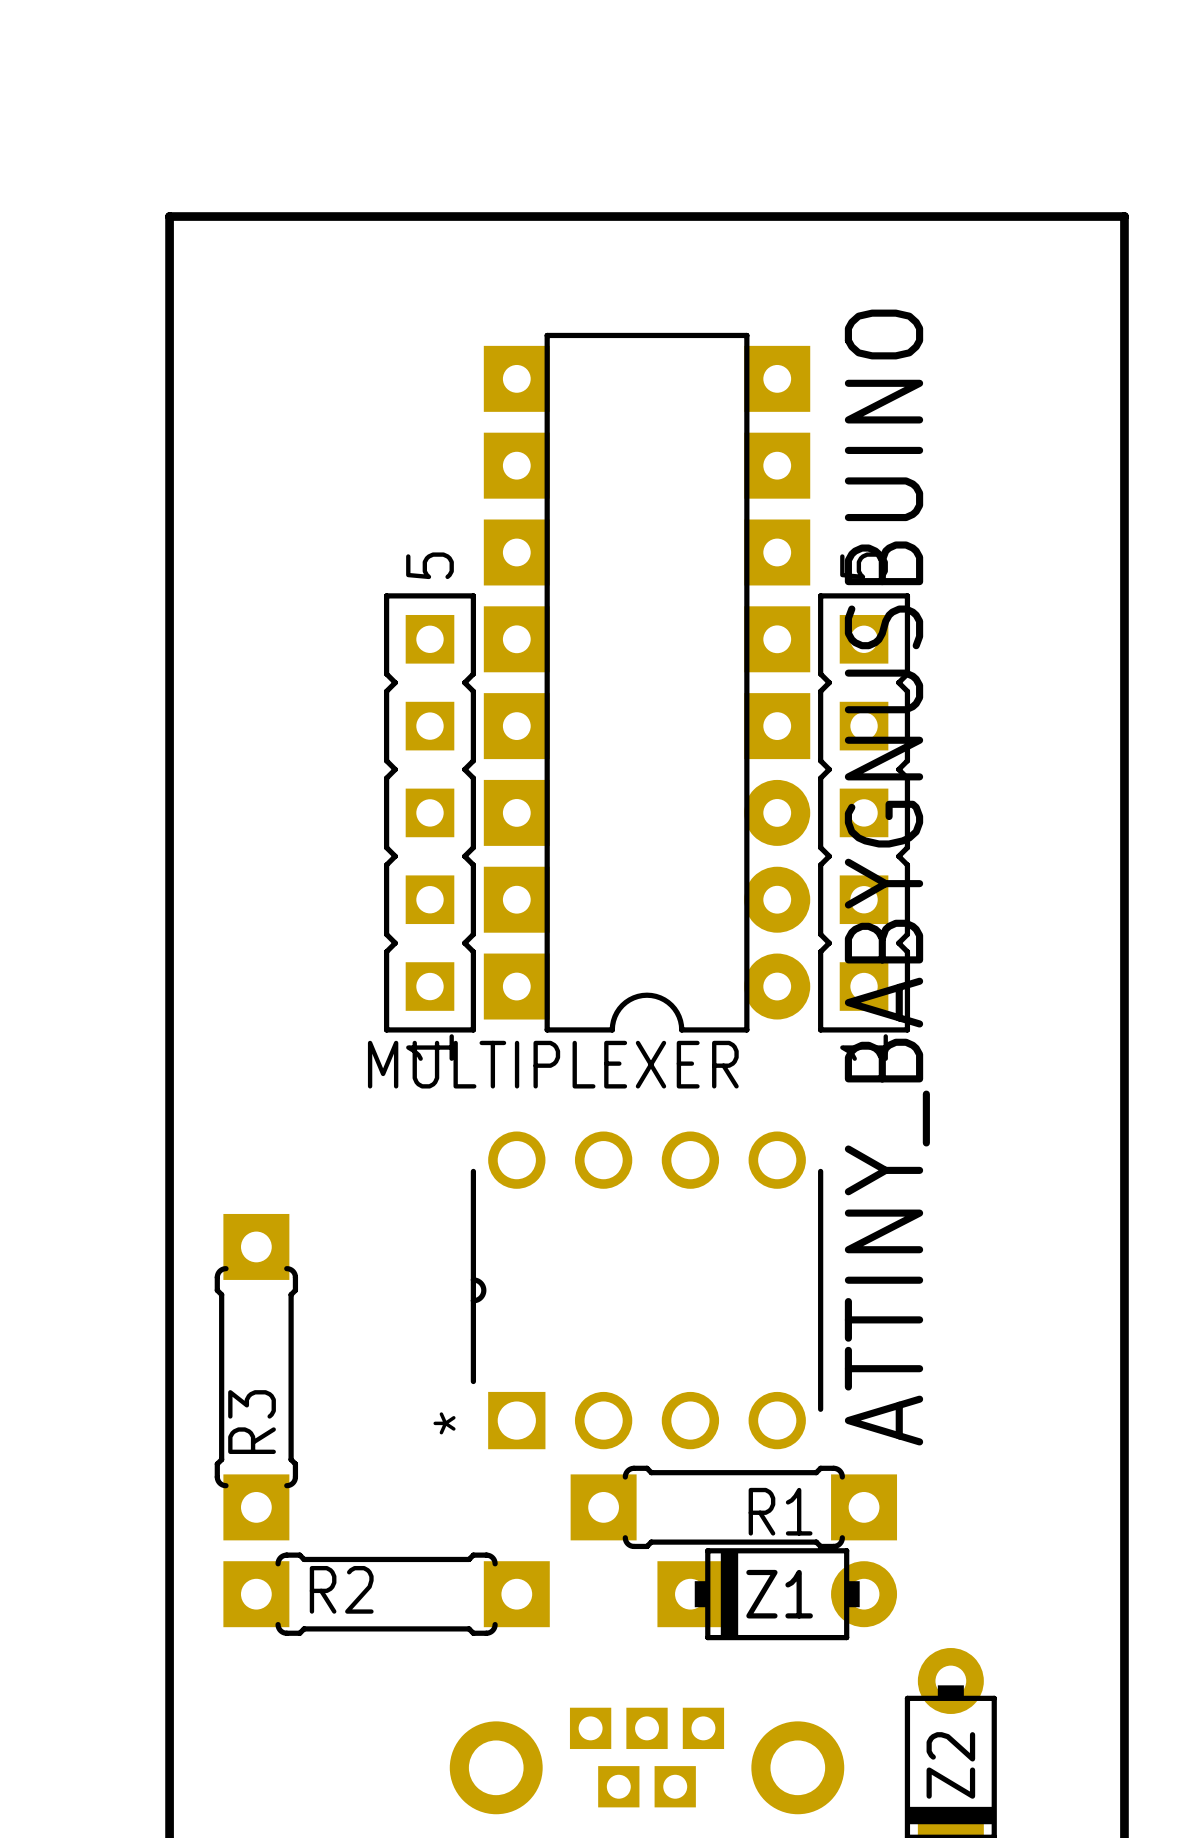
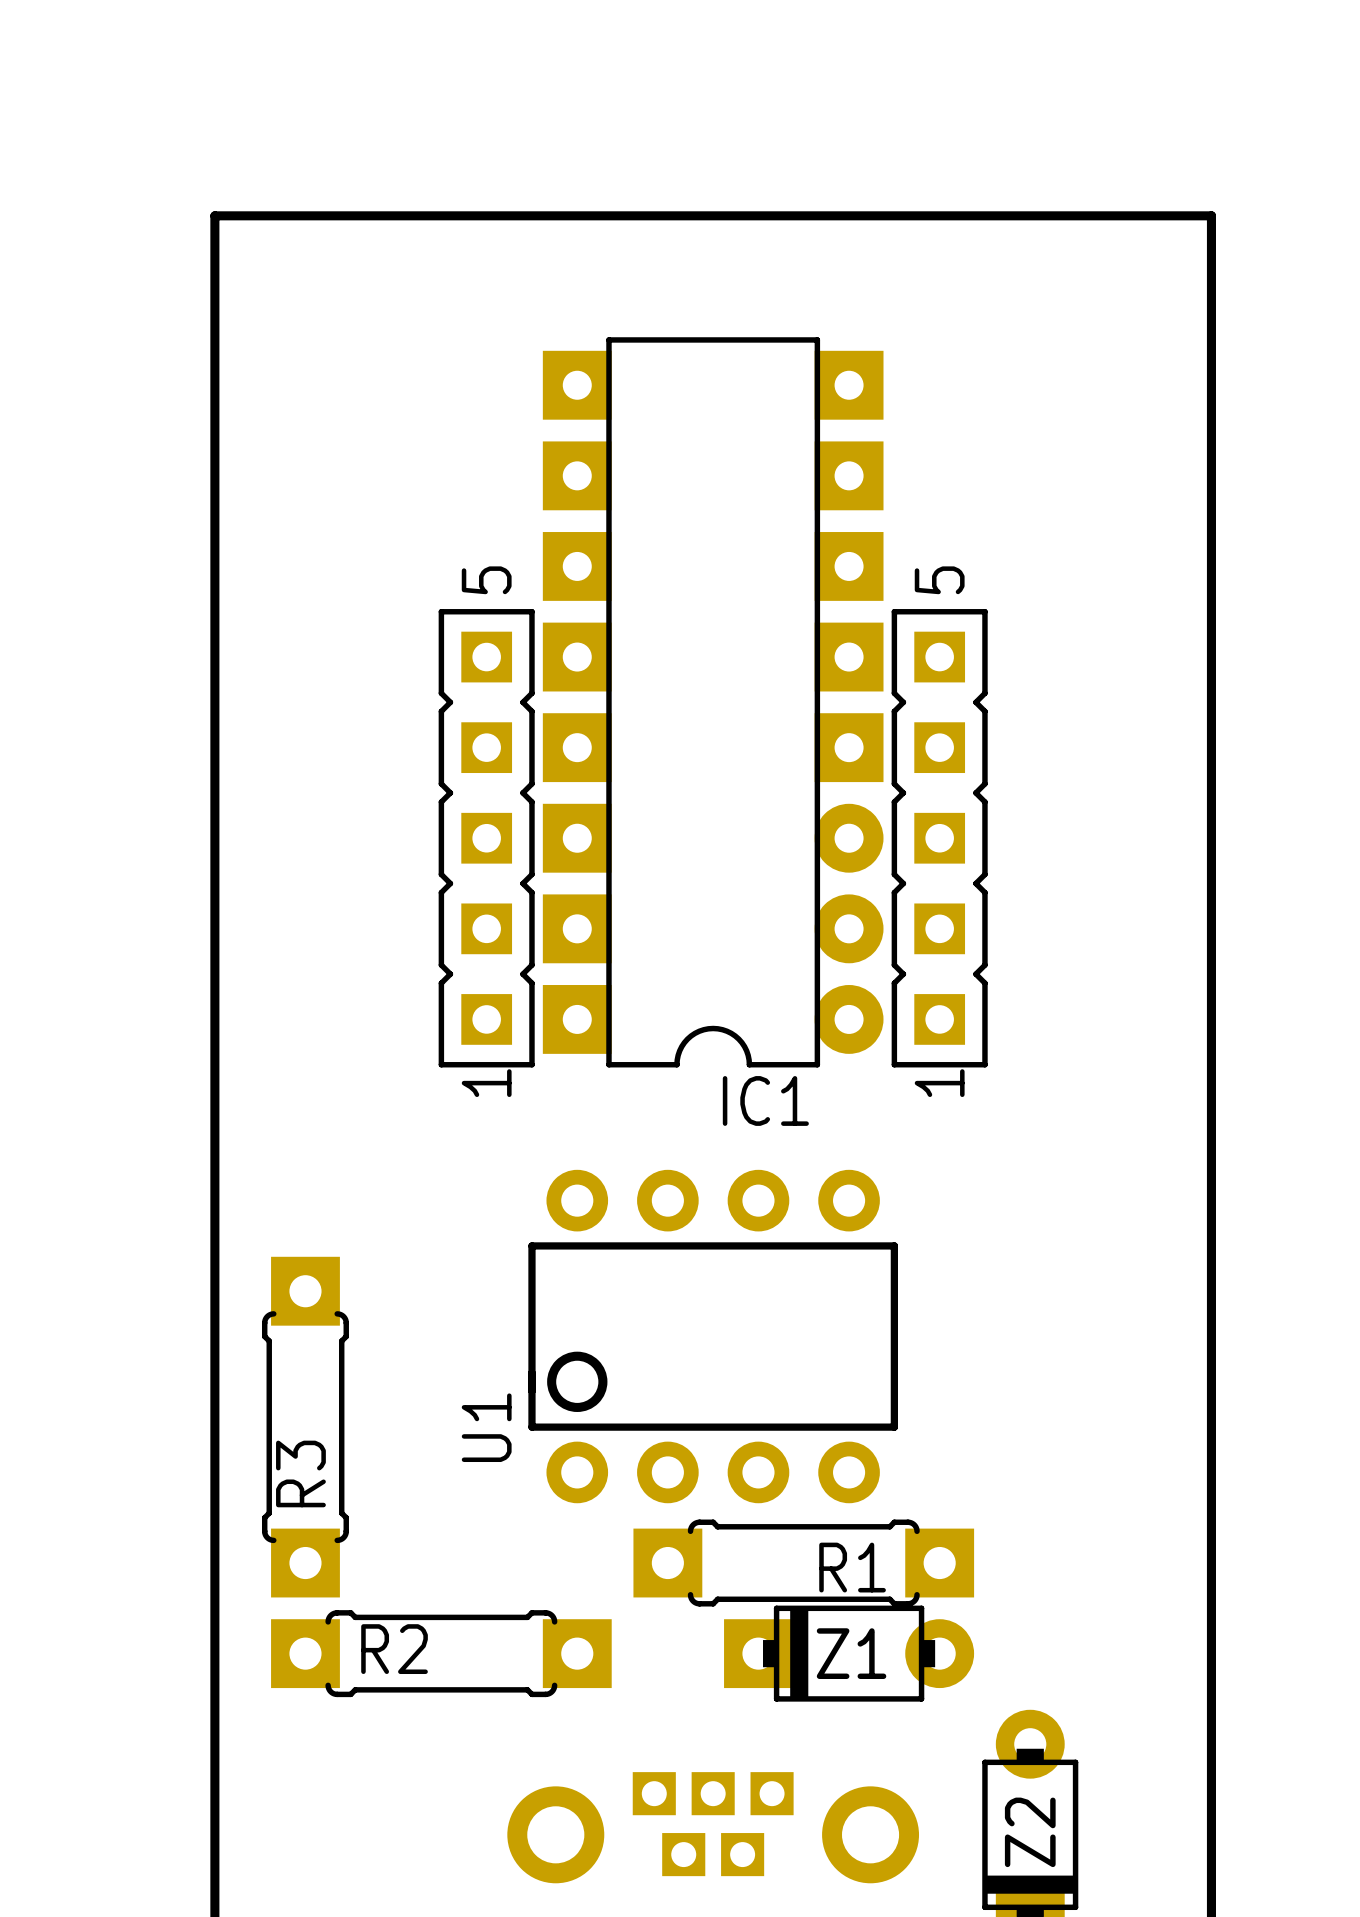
MULTIPLEXER name: MULTIPLEXER (553, 1064) -> IC1 (765, 1100)
ATTINY_BABYGNUSBUINO: (647, 1290) -> none
U1: none -> (713, 1336)

